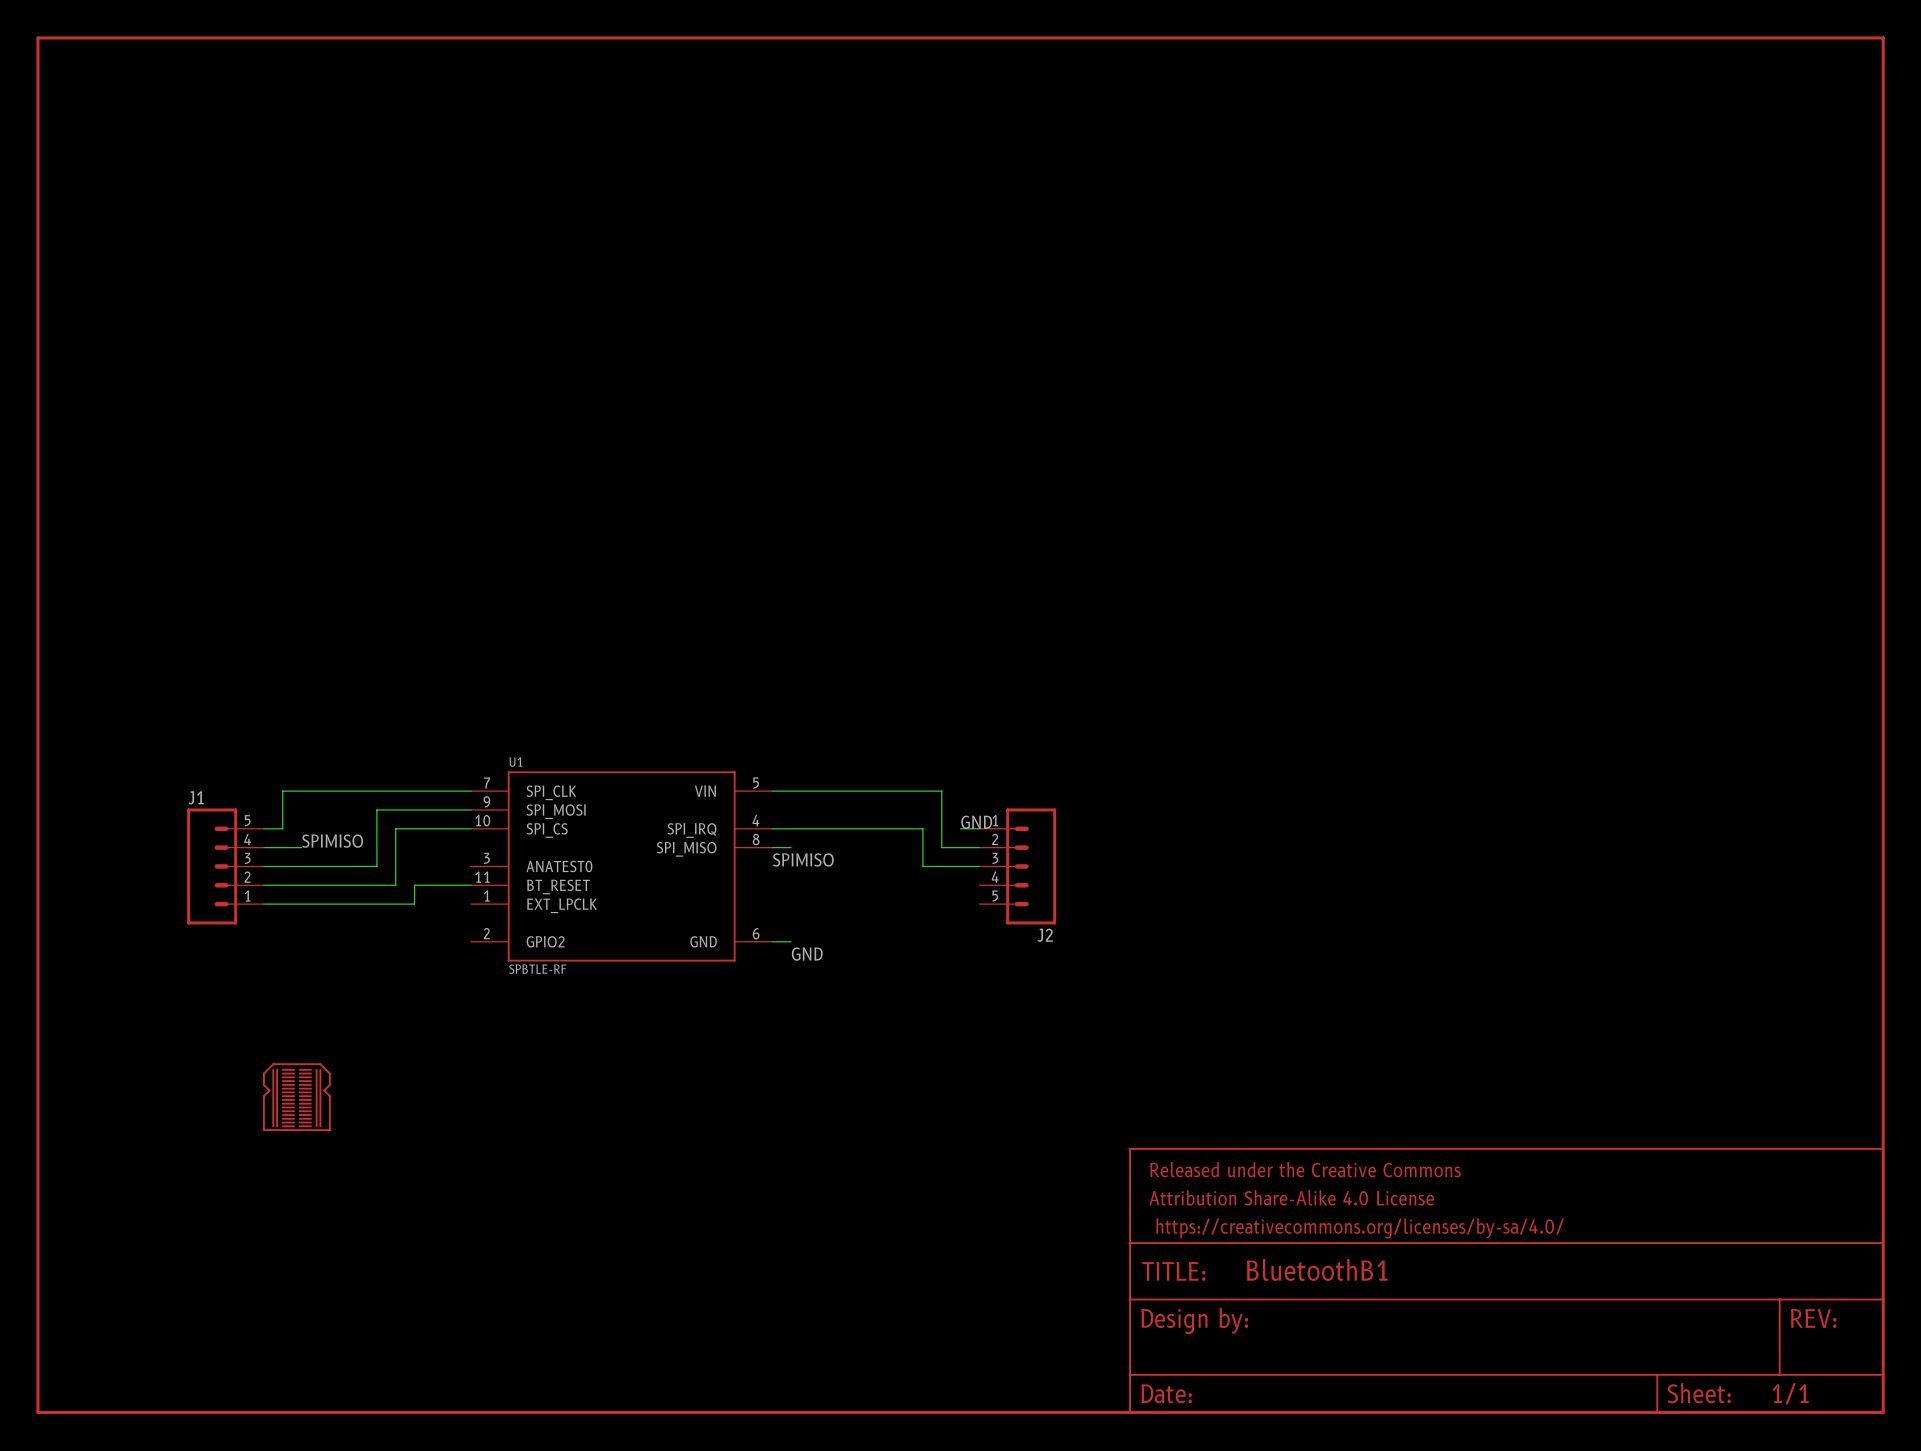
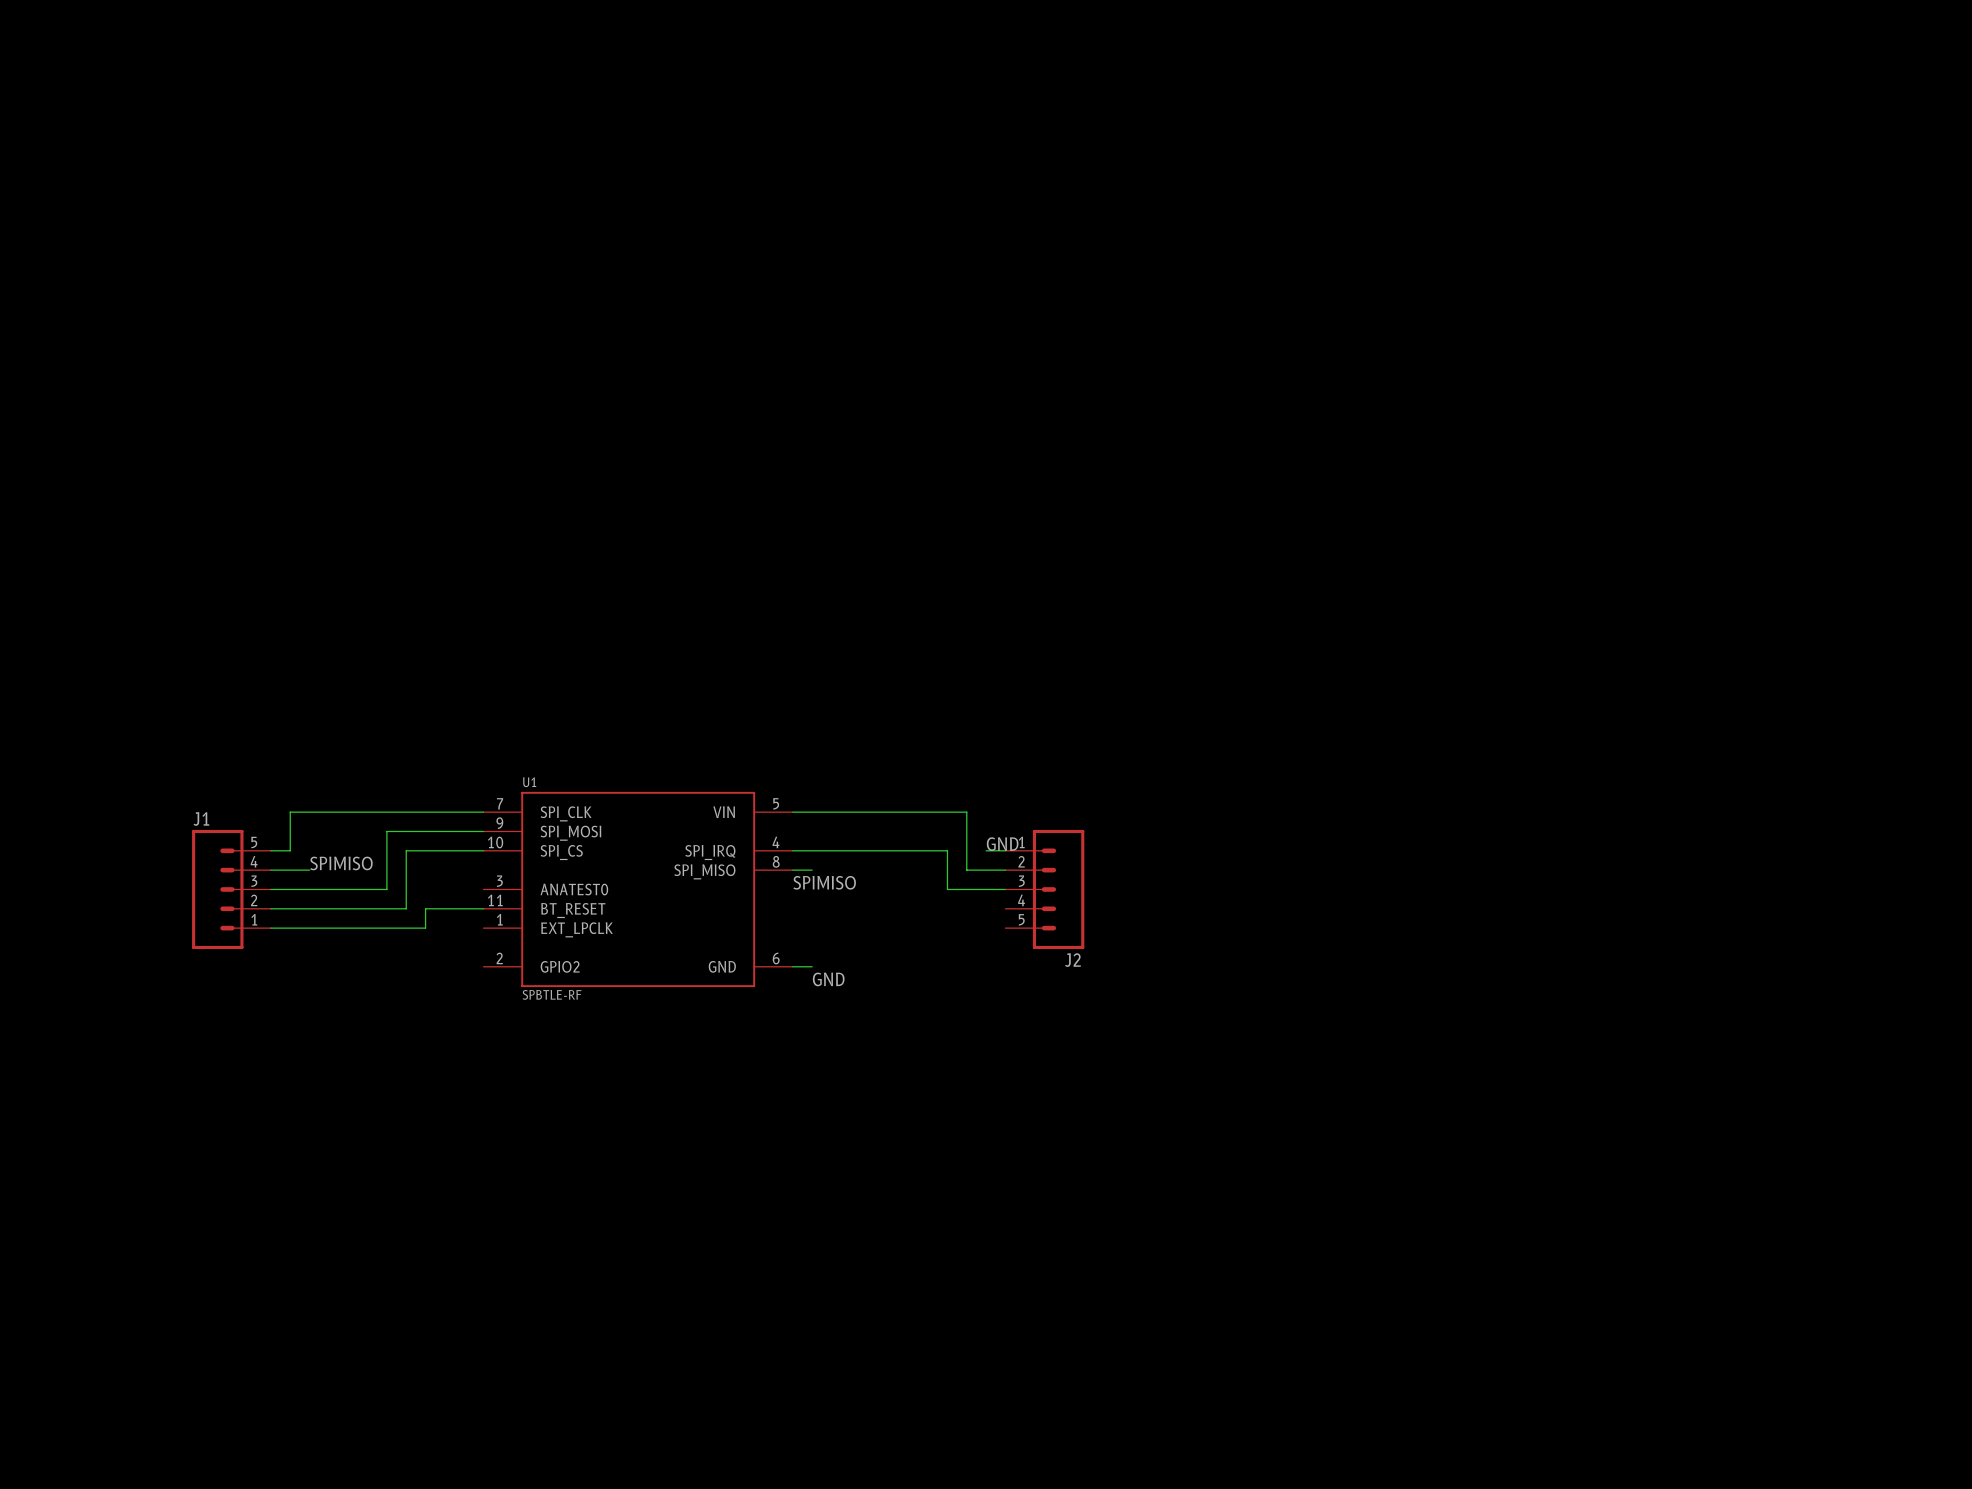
part: (960, 725) -> none
part: (296, 1097) -> none
part: (1506, 1280) -> none

